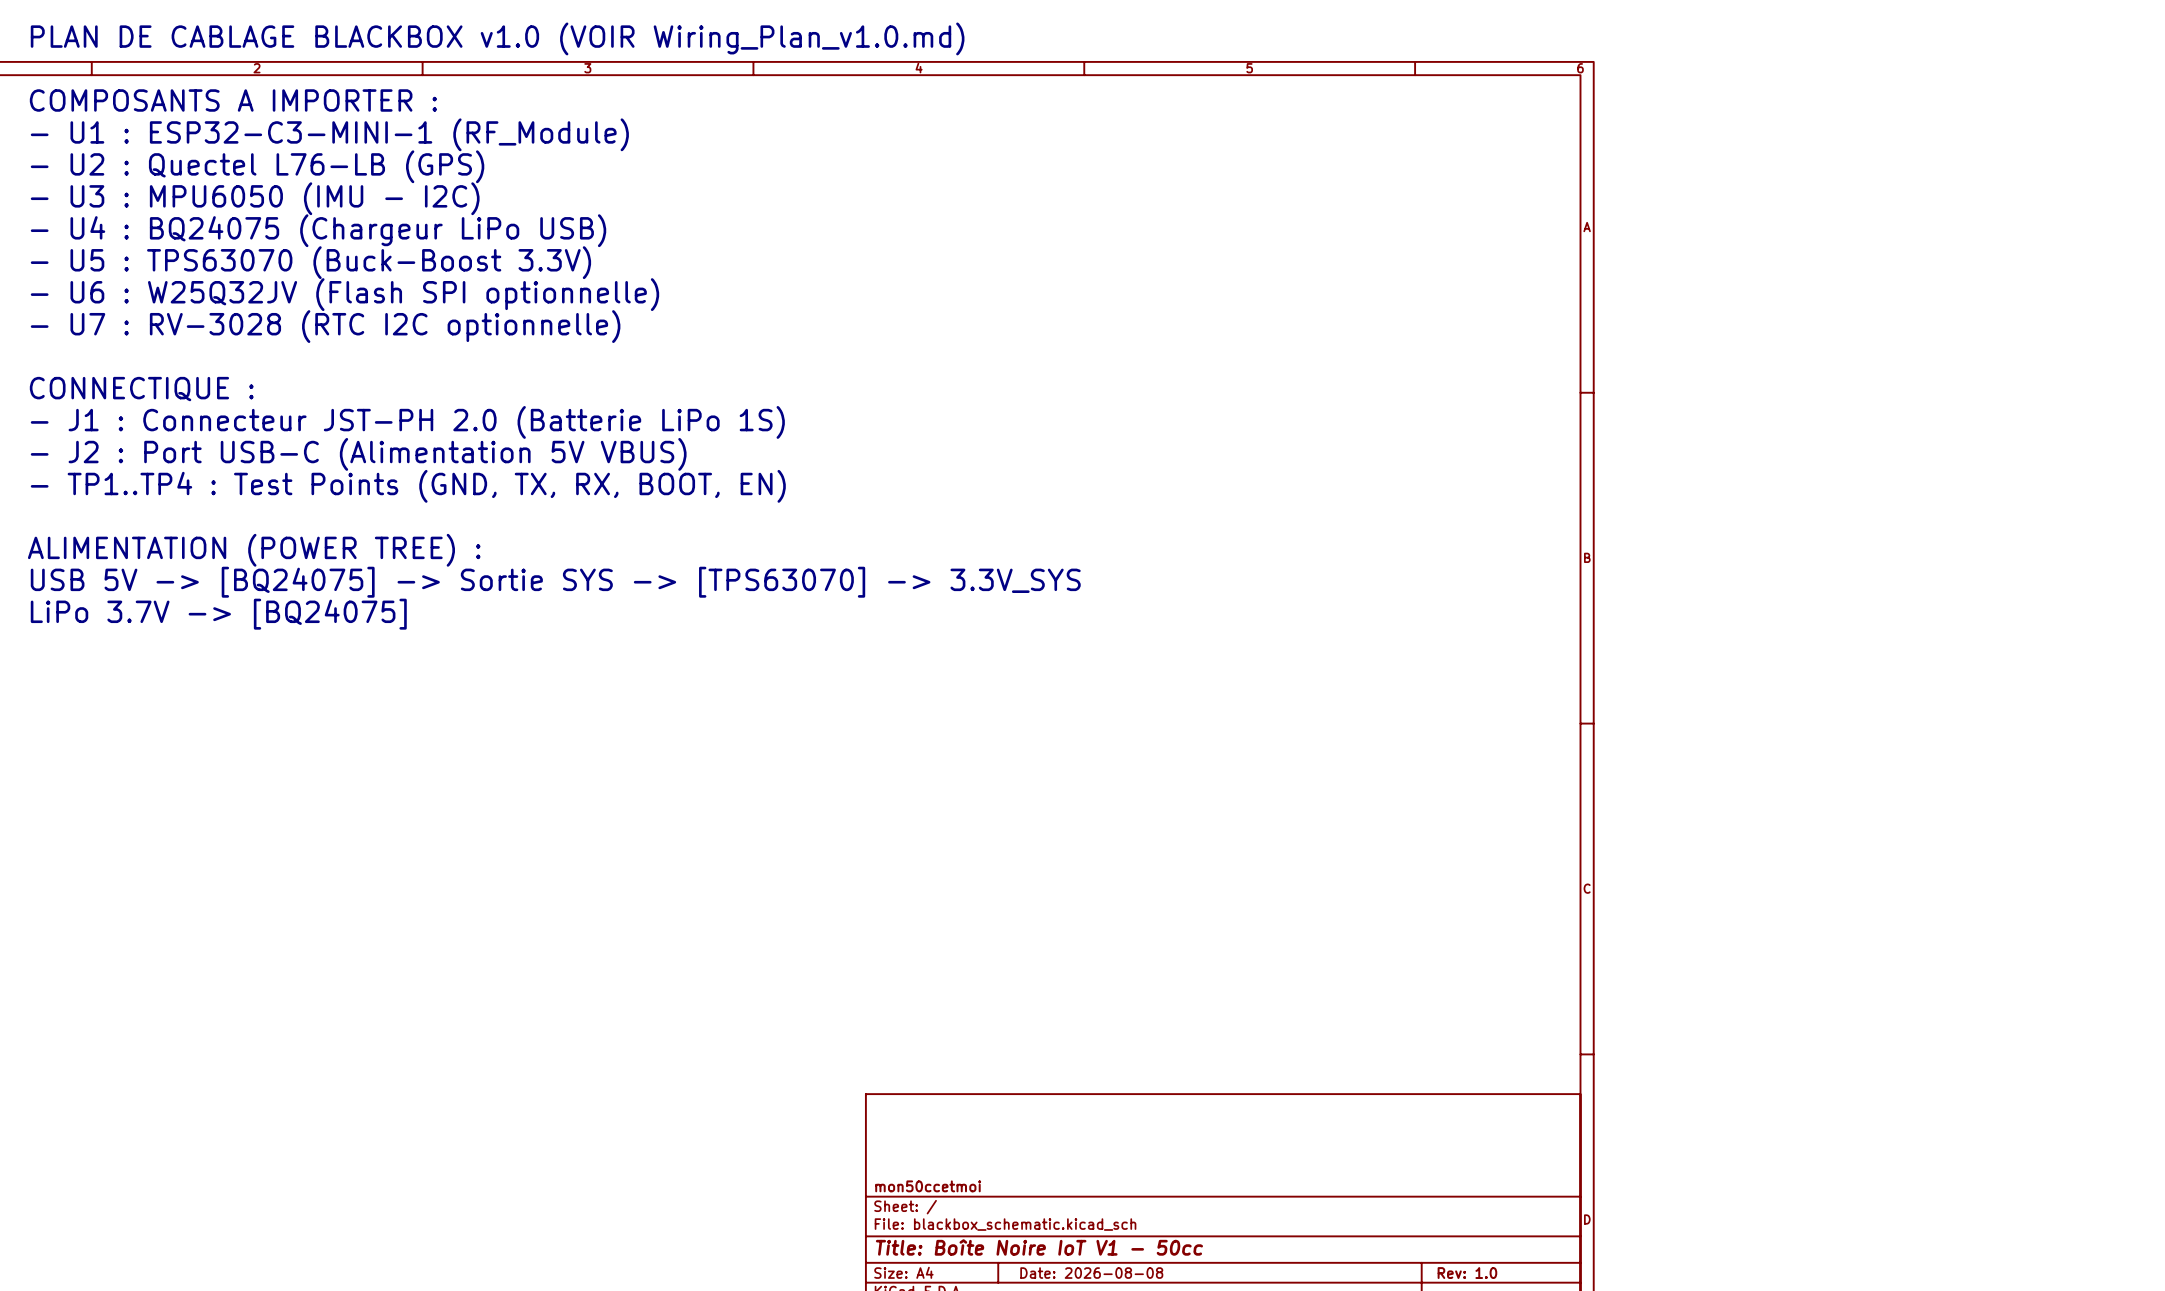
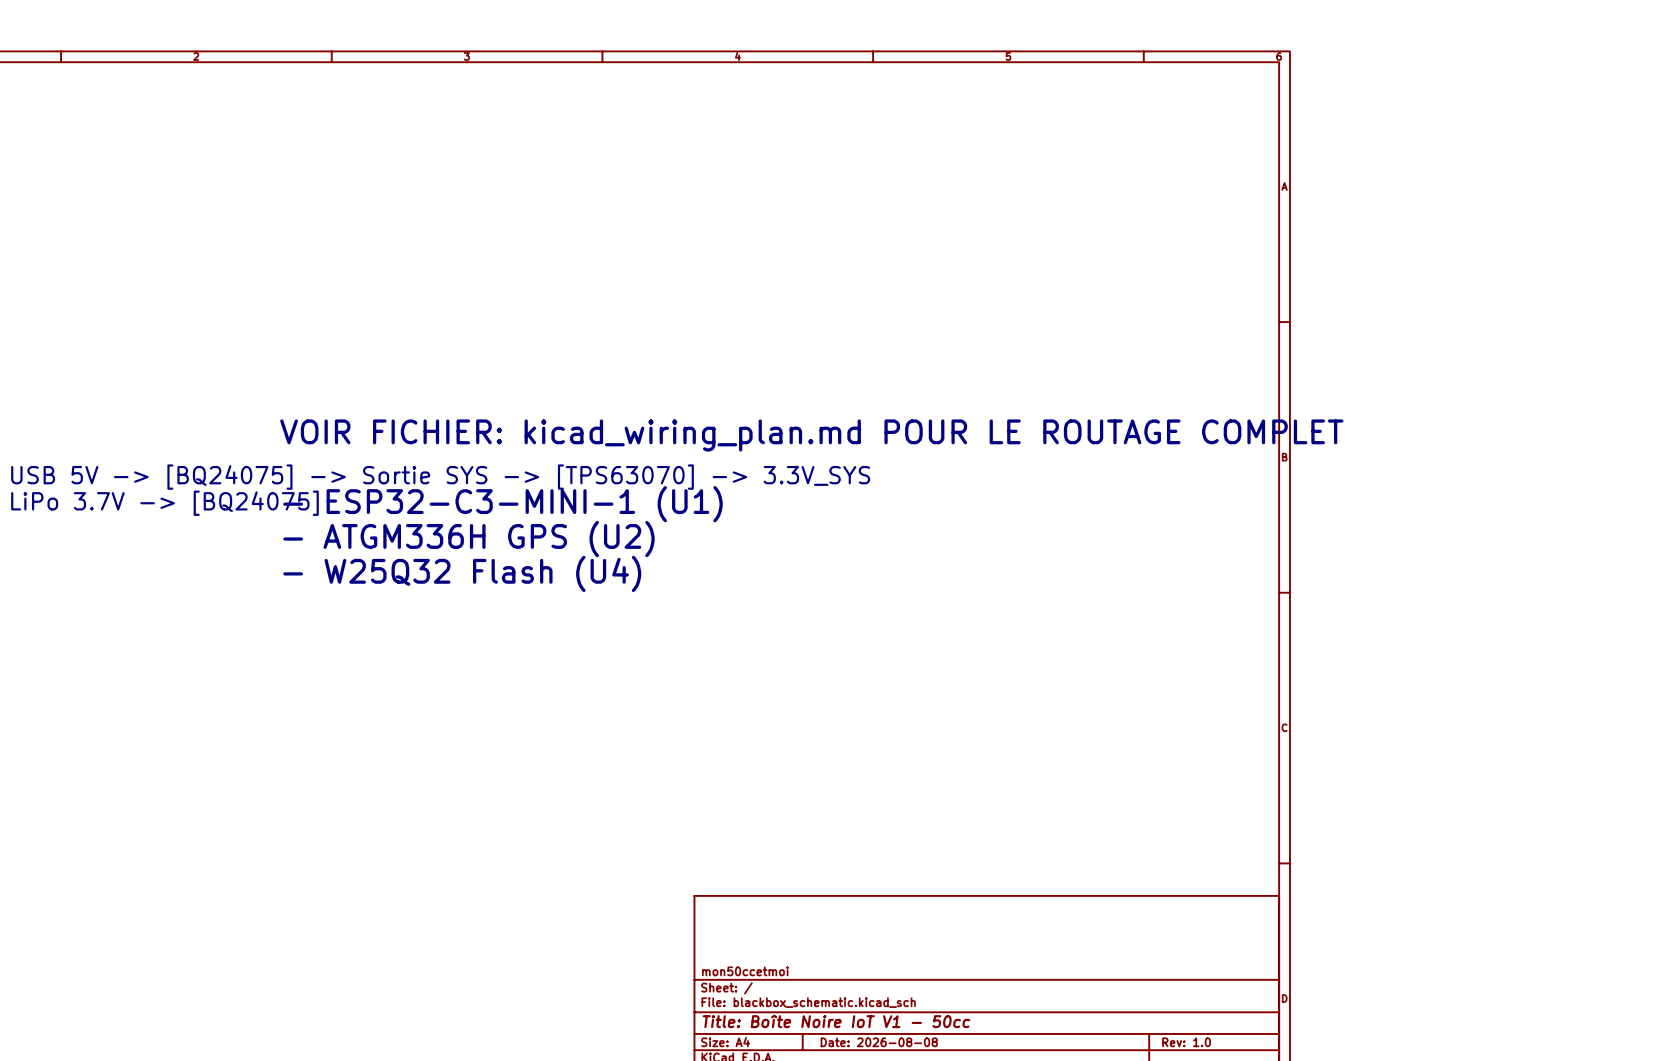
text: PLAN DE CABLAGE BLACKBOX v1.0 (VOIR Wiring_Plan_v1.0.md) (497, 38) -> none
text: COMPOSANTS A IMPORTER : (233, 100) -> none
text: - U1 : ESP32-C3-MINI-1 (RF_Module) (329, 134) -> none
text: - U2 : Quectel L76-LB (GPS) (257, 166) -> none
text: - U3 : MPU6050 (IMU - I2C) (255, 198) -> none
text: - U4 : BQ24075 (Chargeur LiPo USB) (318, 230) -> none
text: - U5 : TPS63070 (Buck-Boost 3.3V) (310, 262) -> none
text: - U6 : W25Q32JV (Flash SPI optionnelle) (344, 294) -> none
text: - U7 : RV-3028 (RTC I2C optionnelle) (325, 326) -> none
text: CONNECTIQUE : (141, 389) -> none
text: - J1 : Connecteur JST-PH 2.0 (Batterie LiPo 1S) (407, 422) -> none
text: - J2 : Port USB-C (Alimentation 5V VBUS) (358, 454) -> none
text: - TP1..TP4 : Test Points (GND, TX, RX, BOOT, EN) (408, 486) -> none
text: none -> VOIR FICHIER: kicad_wiring_plan.md POUR LE ROUTAGE COMPLET (811, 435)
text: ALIMENTATION (POWER TREE) : (254, 550) -> none
text: none -> - ESP32-C3-MINI-1 (U1) (502, 504)
text: none -> - ATGM336H GPS (U2) (468, 539)
text: none -> - W25Q32 Flash (U4) (462, 573)

